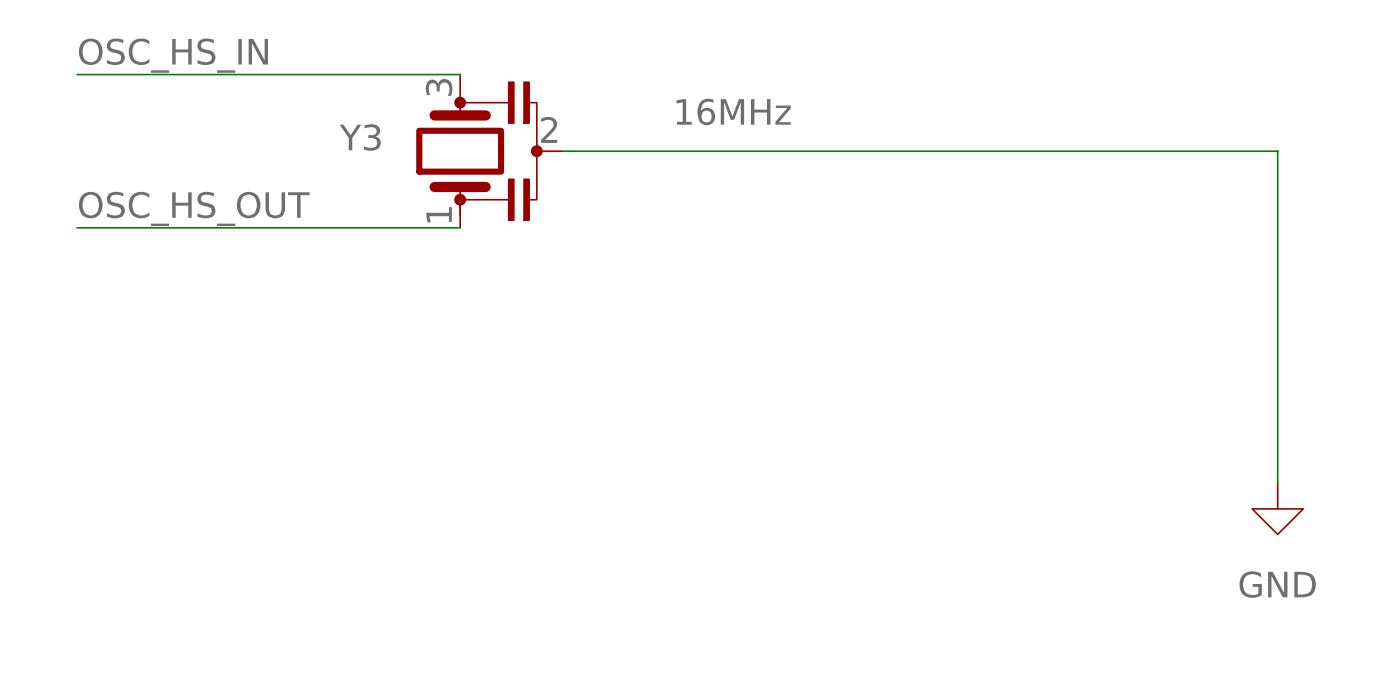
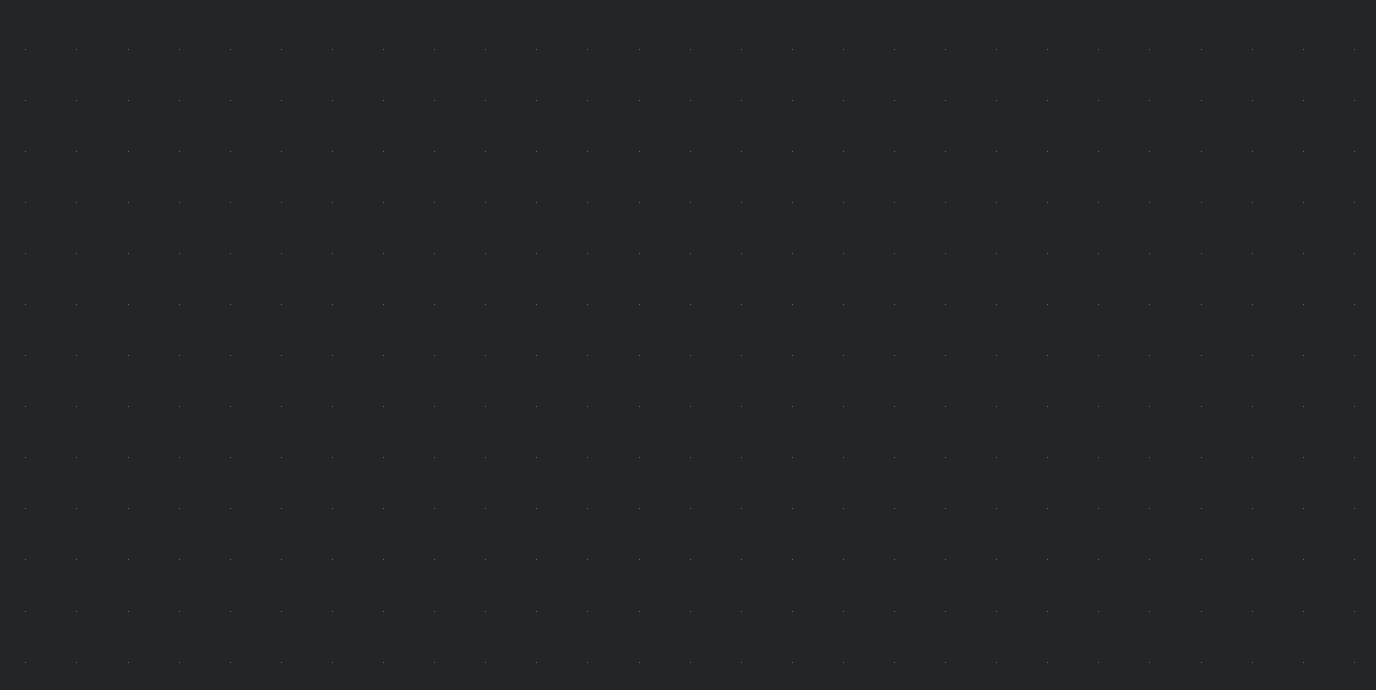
label: OSC_HS_IN (173, 55) -> none
wire: (76, 74) (460, 74) -> none
Y3: 16MHz (489, 151) -> none
wire: (562, 151) (1277, 151) (1277, 483) -> none
label: OSC_HS_OUT (194, 208) -> none
wire: (76, 227) (460, 227) -> none
power symbol: GND (1277, 508) -> none

